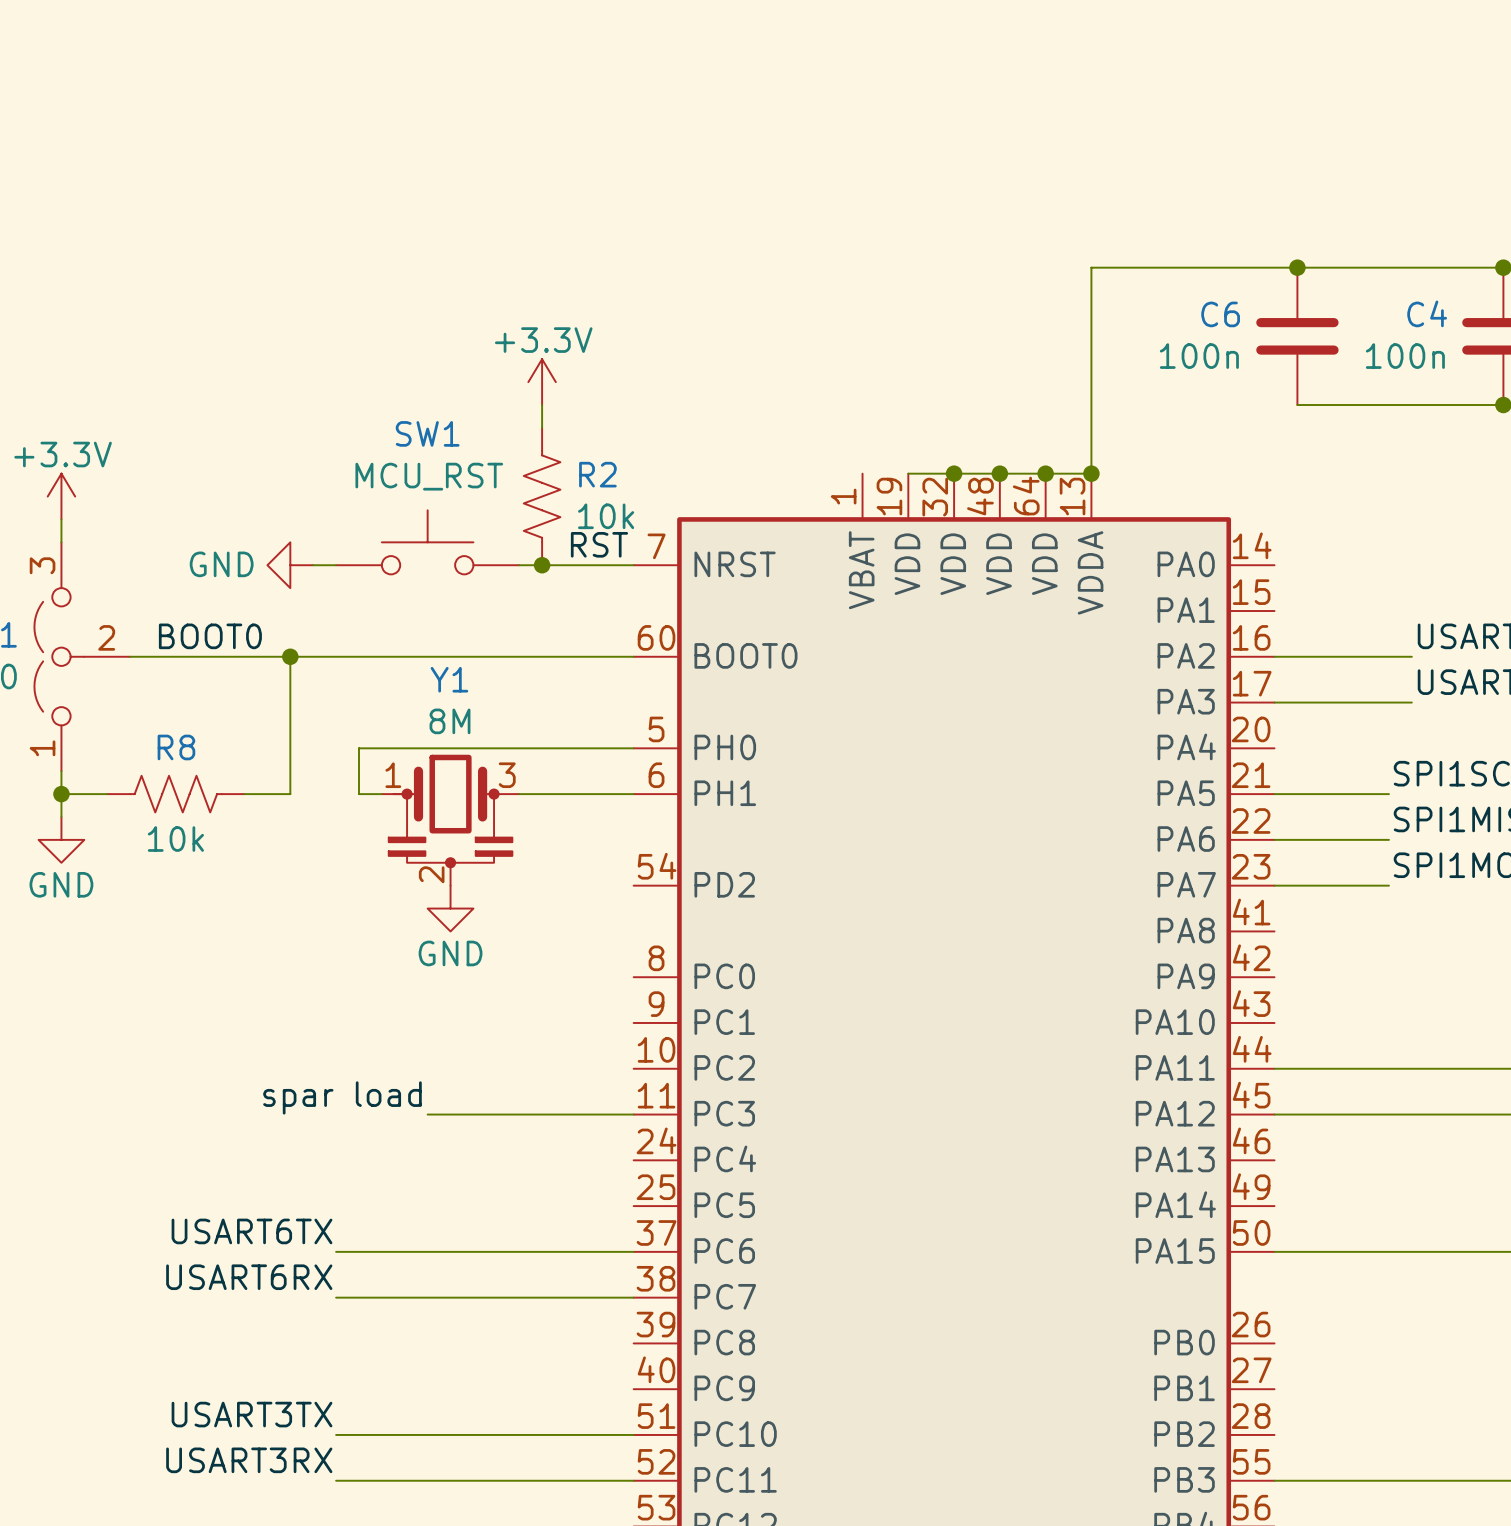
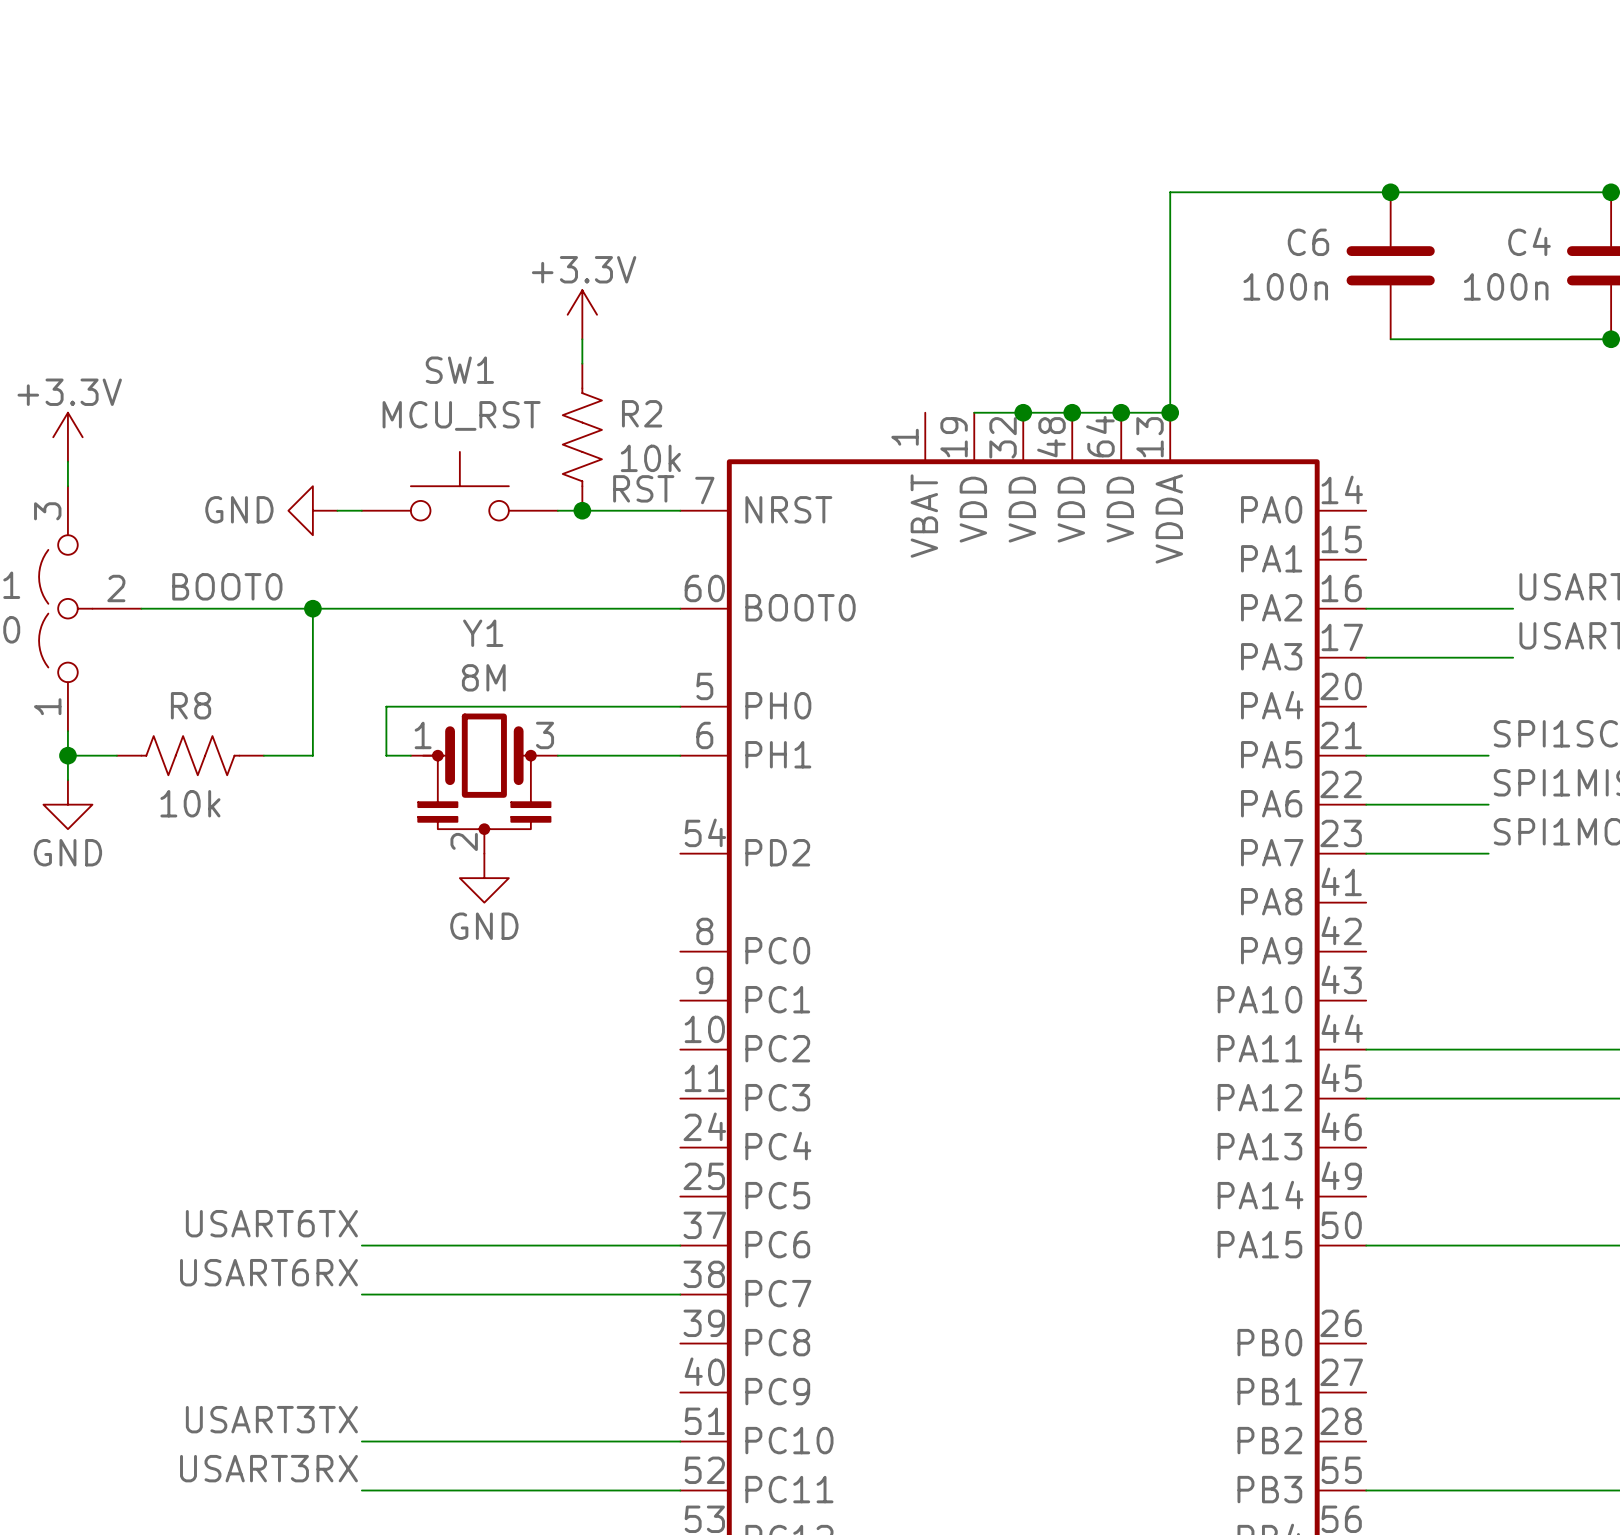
label: spar load (342, 1097) -> none
wire: (427, 1114) (633, 1114) -> none

